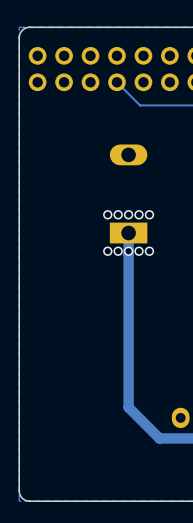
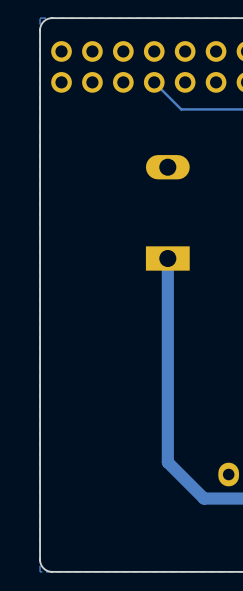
via: (107, 214) -> none
via: (118, 214) -> none
via: (128, 214) -> none
via: (139, 214) -> none
via: (149, 214) -> none
via: (107, 251) -> none
via: (118, 251) -> none
via: (128, 251) -> none
via: (139, 251) -> none
via: (149, 251) -> none

